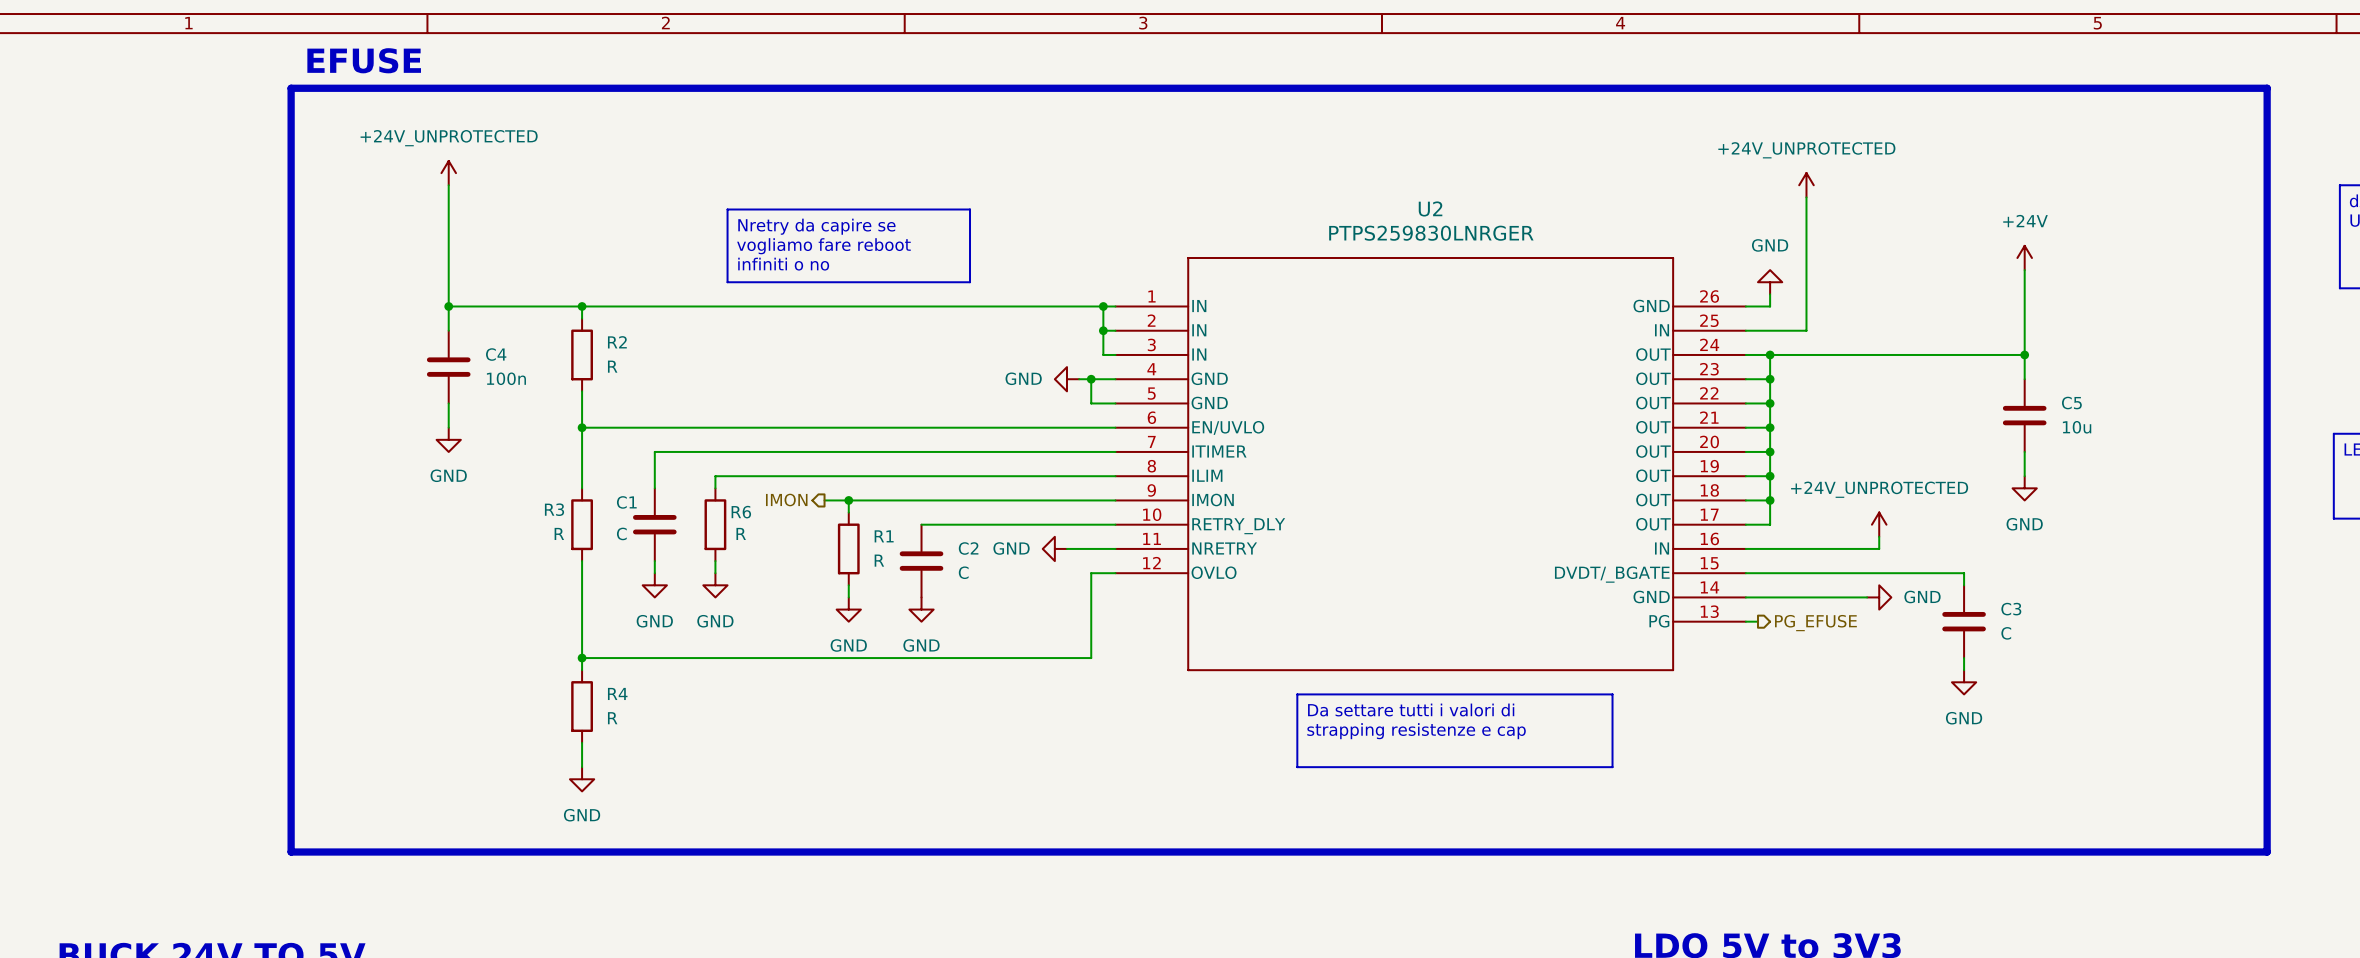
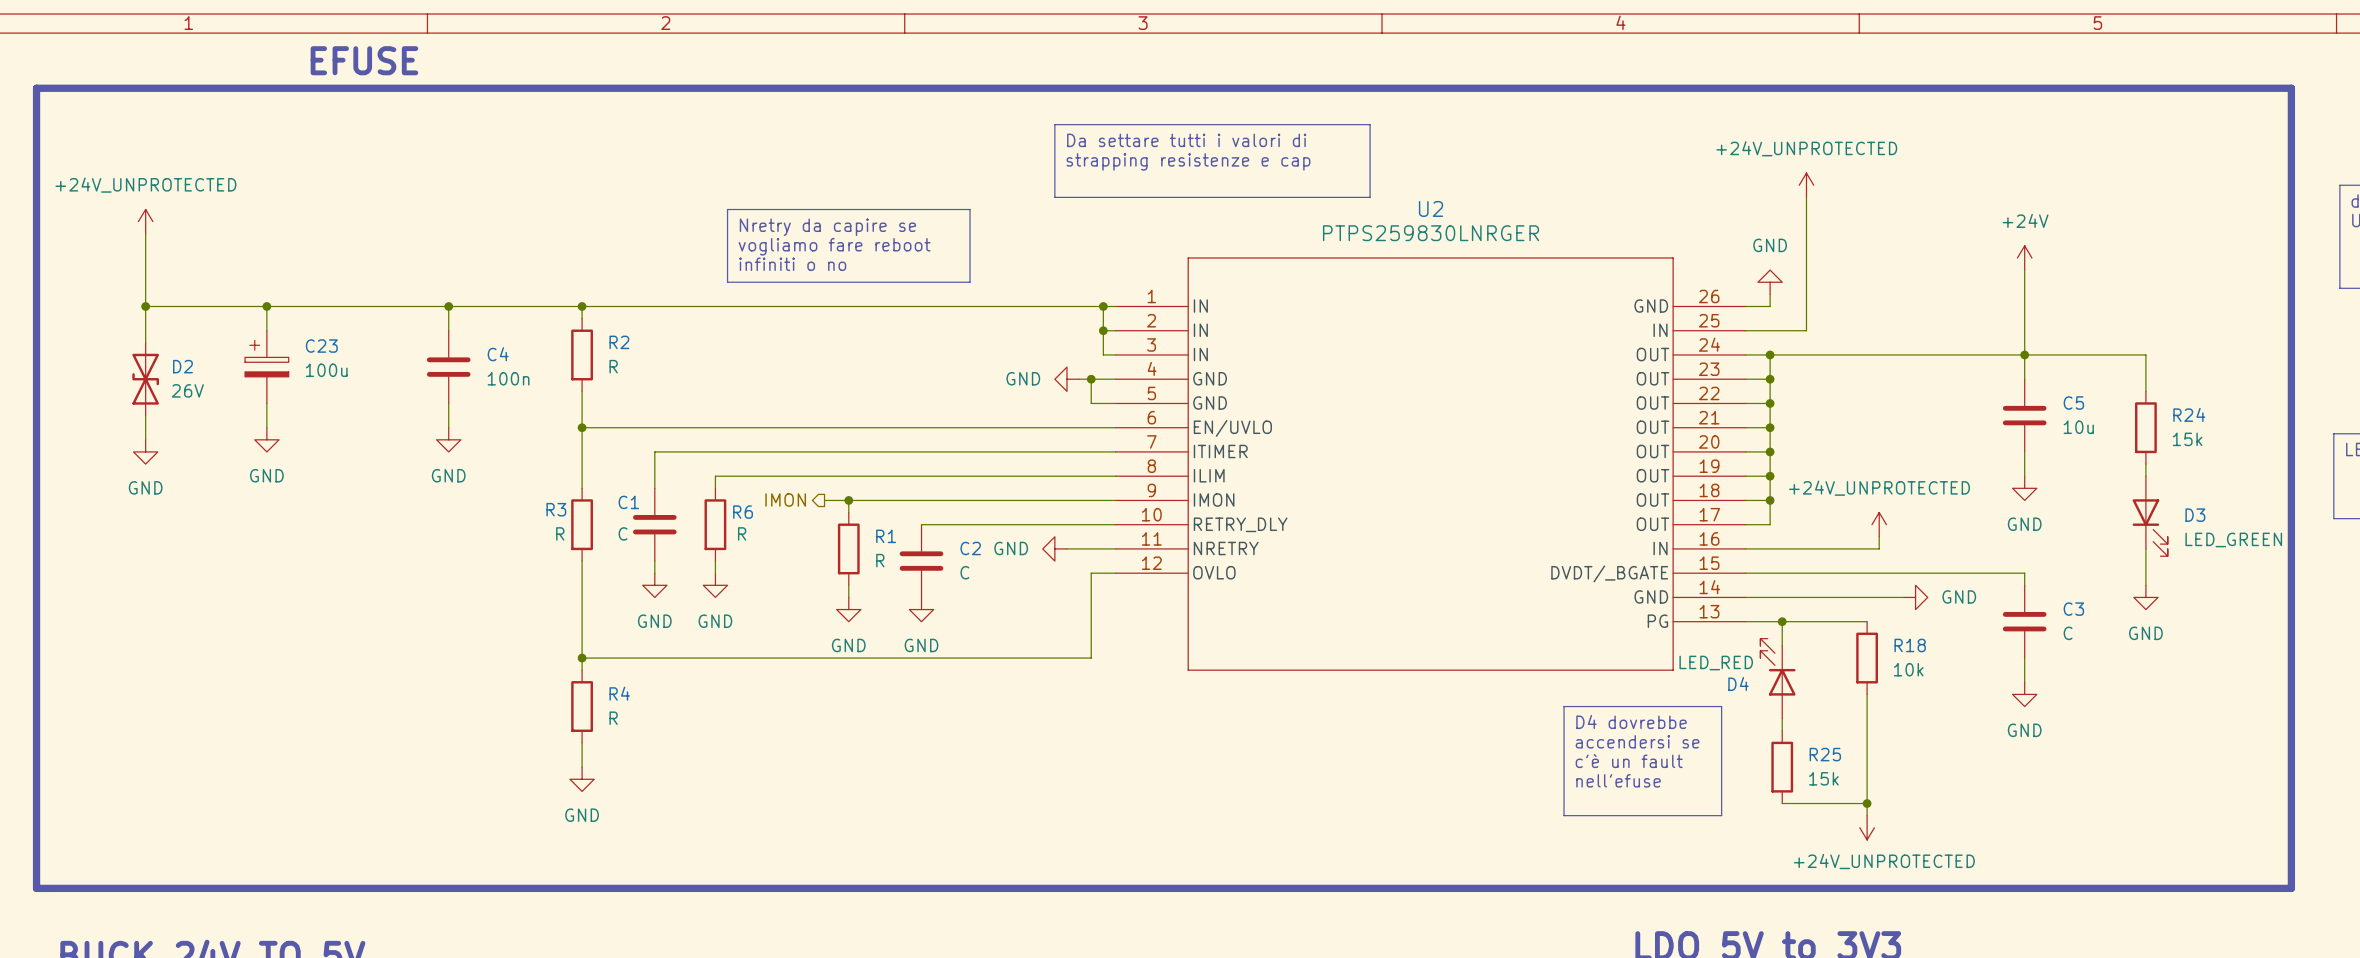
line: (291, 88) (291, 852) (2267, 852) (2267, 88) -> (291, 88) (36, 88) (36, 888) (2291, 888) (2291, 88) (2267, 88)
line: none -> (1054, 124) (1370, 124) (1370, 197) (1054, 197) (1054, 124)
text: none -> Da settare tutti i valori di (1186, 140)
text: none -> strapping resistenze e cap (1188, 161)
power symbol: +24V_UNPROTECTED (448, 173) -> none
wire: (448, 185) (448, 306) -> (145, 306) (448, 306)
power symbol: none -> +24V_UNPROTECTED (145, 221)
wire: none -> (145, 233) (145, 342)
junction: none -> (145, 306)
wire: none -> (266, 306) (266, 330)
junction: none -> (266, 306)
wire: none -> (2024, 354) (2145, 354) (2145, 391)
C23: none -> 100u (266, 367)
D2: none -> 26V (145, 379)
wire: none -> (266, 403) (266, 427)
wire: none -> (145, 415) (145, 439)
R24: none -> 15k (2145, 427)
power symbol: none -> GND (266, 439)
power symbol: none -> GND (145, 451)
wire: none -> (2145, 464) (2145, 476)
D3: none -> LED_GREEN (2150, 516)
wire: none -> (2145, 548) (2145, 585)
wire: (1964, 573) (1964, 585) -> (1964, 573) (2024, 573) (2024, 585)
wire: none -> (1867, 597) (1903, 597)
power symbol position: GND (1879, 597) -> GND (1915, 597)
power symbol: none -> GND (2145, 597)
wire: none -> (1757, 621) (1867, 621)
wire: none -> (1782, 621) (1782, 645)
junction: none -> (1782, 621)
C3 position: (1964, 621) -> (2024, 621)
hierarchical label: PG_EFUSE (1815, 623) -> none
R18: none -> 10k (1867, 658)
wire: (1964, 658) (1964, 670) -> (1782, 718) (1782, 730)
wire: none -> (2024, 658) (2024, 682)
D4: none -> LED_RED (1777, 678)
power symbol: GND (1964, 682) -> none
line: (1297, 694) (1612, 694) (1612, 767) (1297, 767) (1297, 694) -> none
wire: none -> (1867, 694) (1867, 815)
power symbol: none -> GND (2024, 694)
line: none -> (1564, 706) (1721, 706) (1721, 815) (1564, 815) (1564, 706)
text: Da settare tutti i valori di (1411, 710) -> none
text: none -> D4 dovrebbe (1631, 721)
text: strapping resistenze e cap (1416, 731) -> none
text: none -> accendersi se (1637, 741)
text: none -> c'è un fault (1629, 761)
R25: none -> 15k (1782, 767)
text: none -> nell'efuse (1618, 780)
wire: none -> (1782, 803) (1867, 803)
junction: none -> (1867, 803)
power symbol: none -> +24V_UNPROTECTED (1867, 827)

